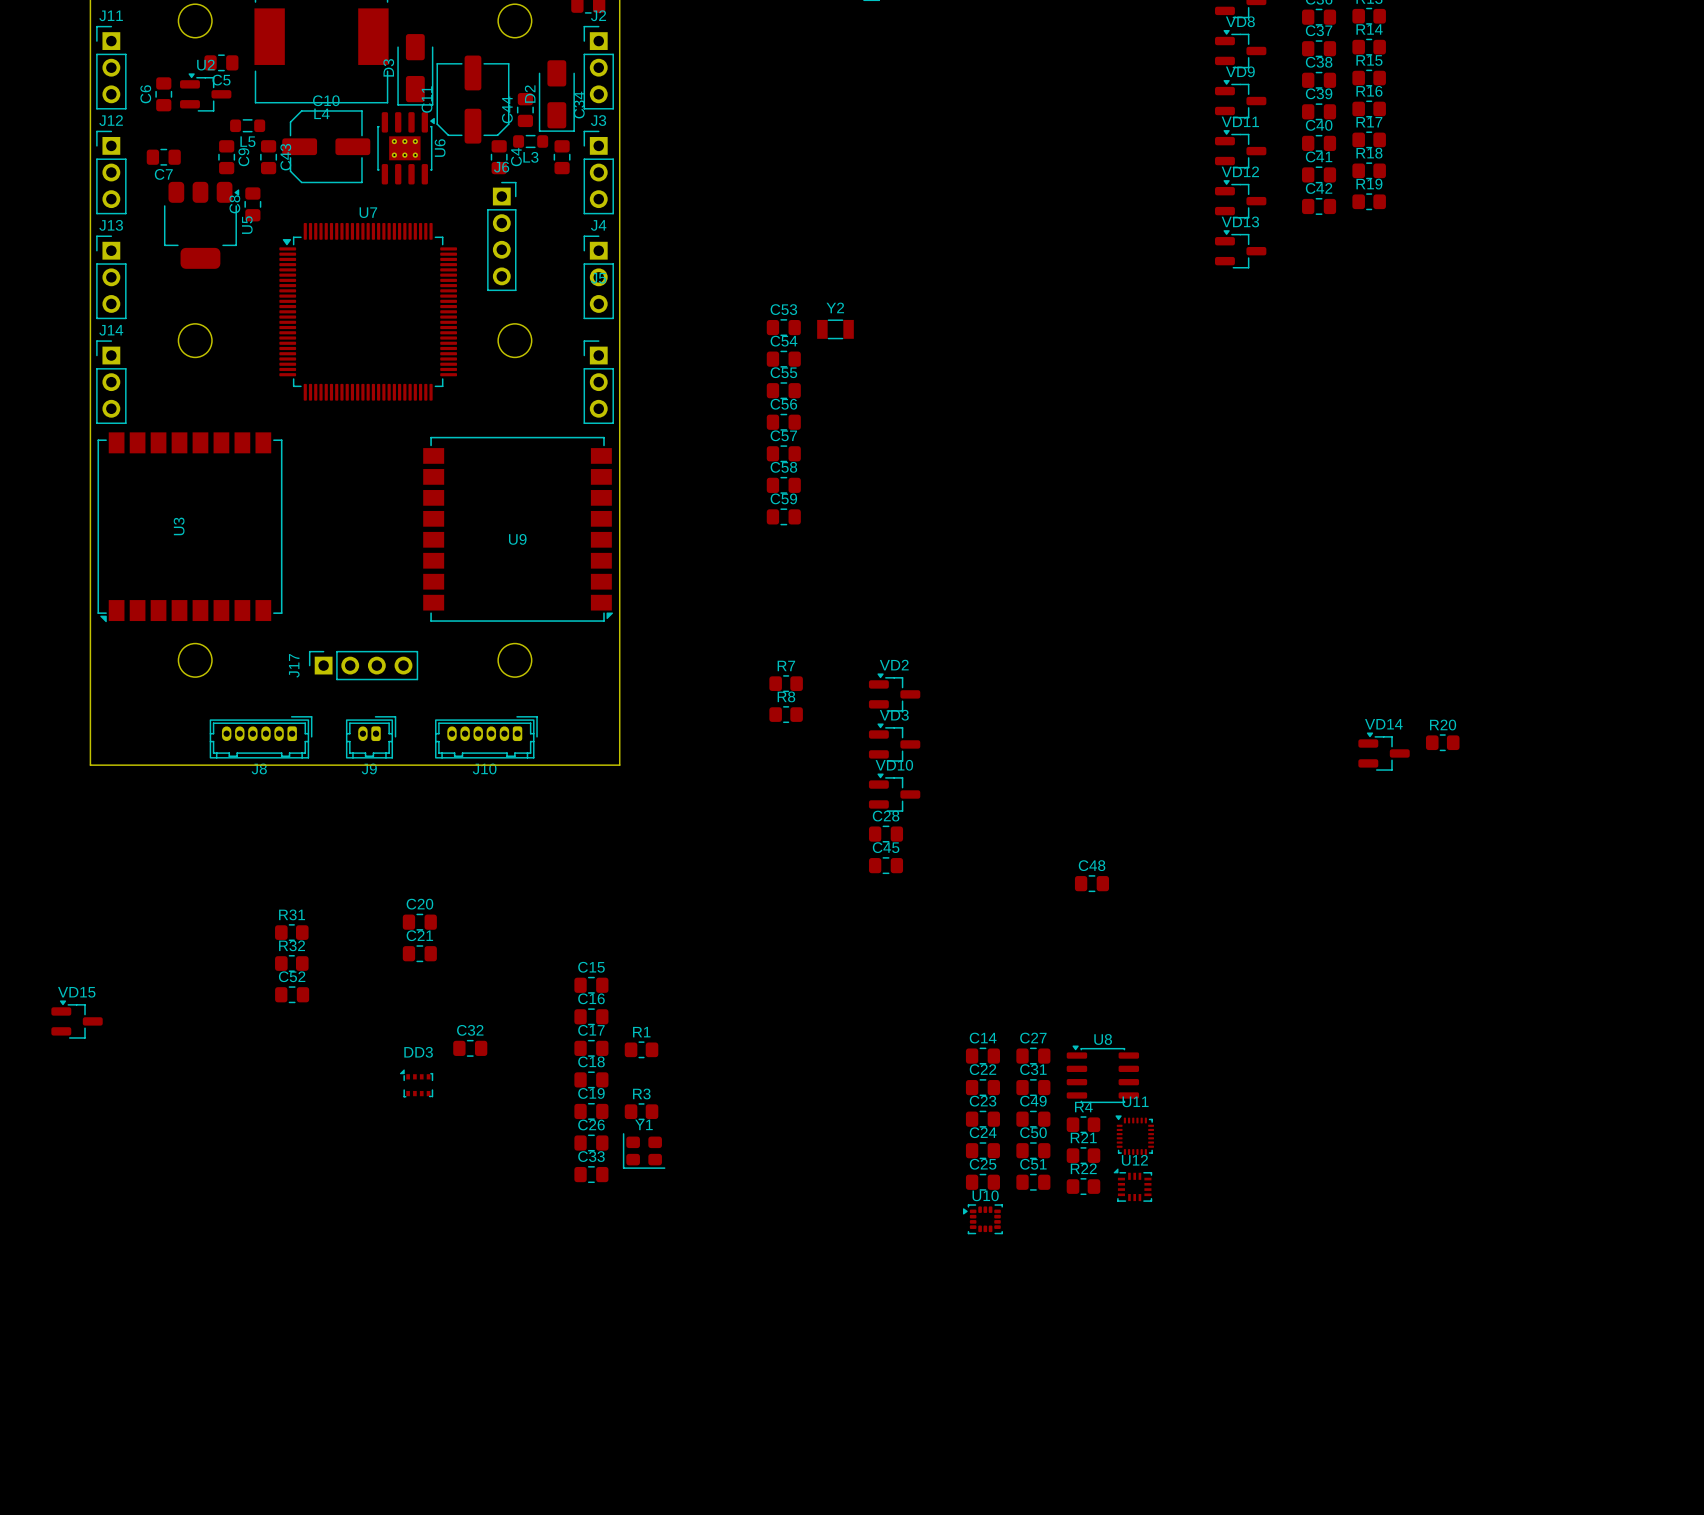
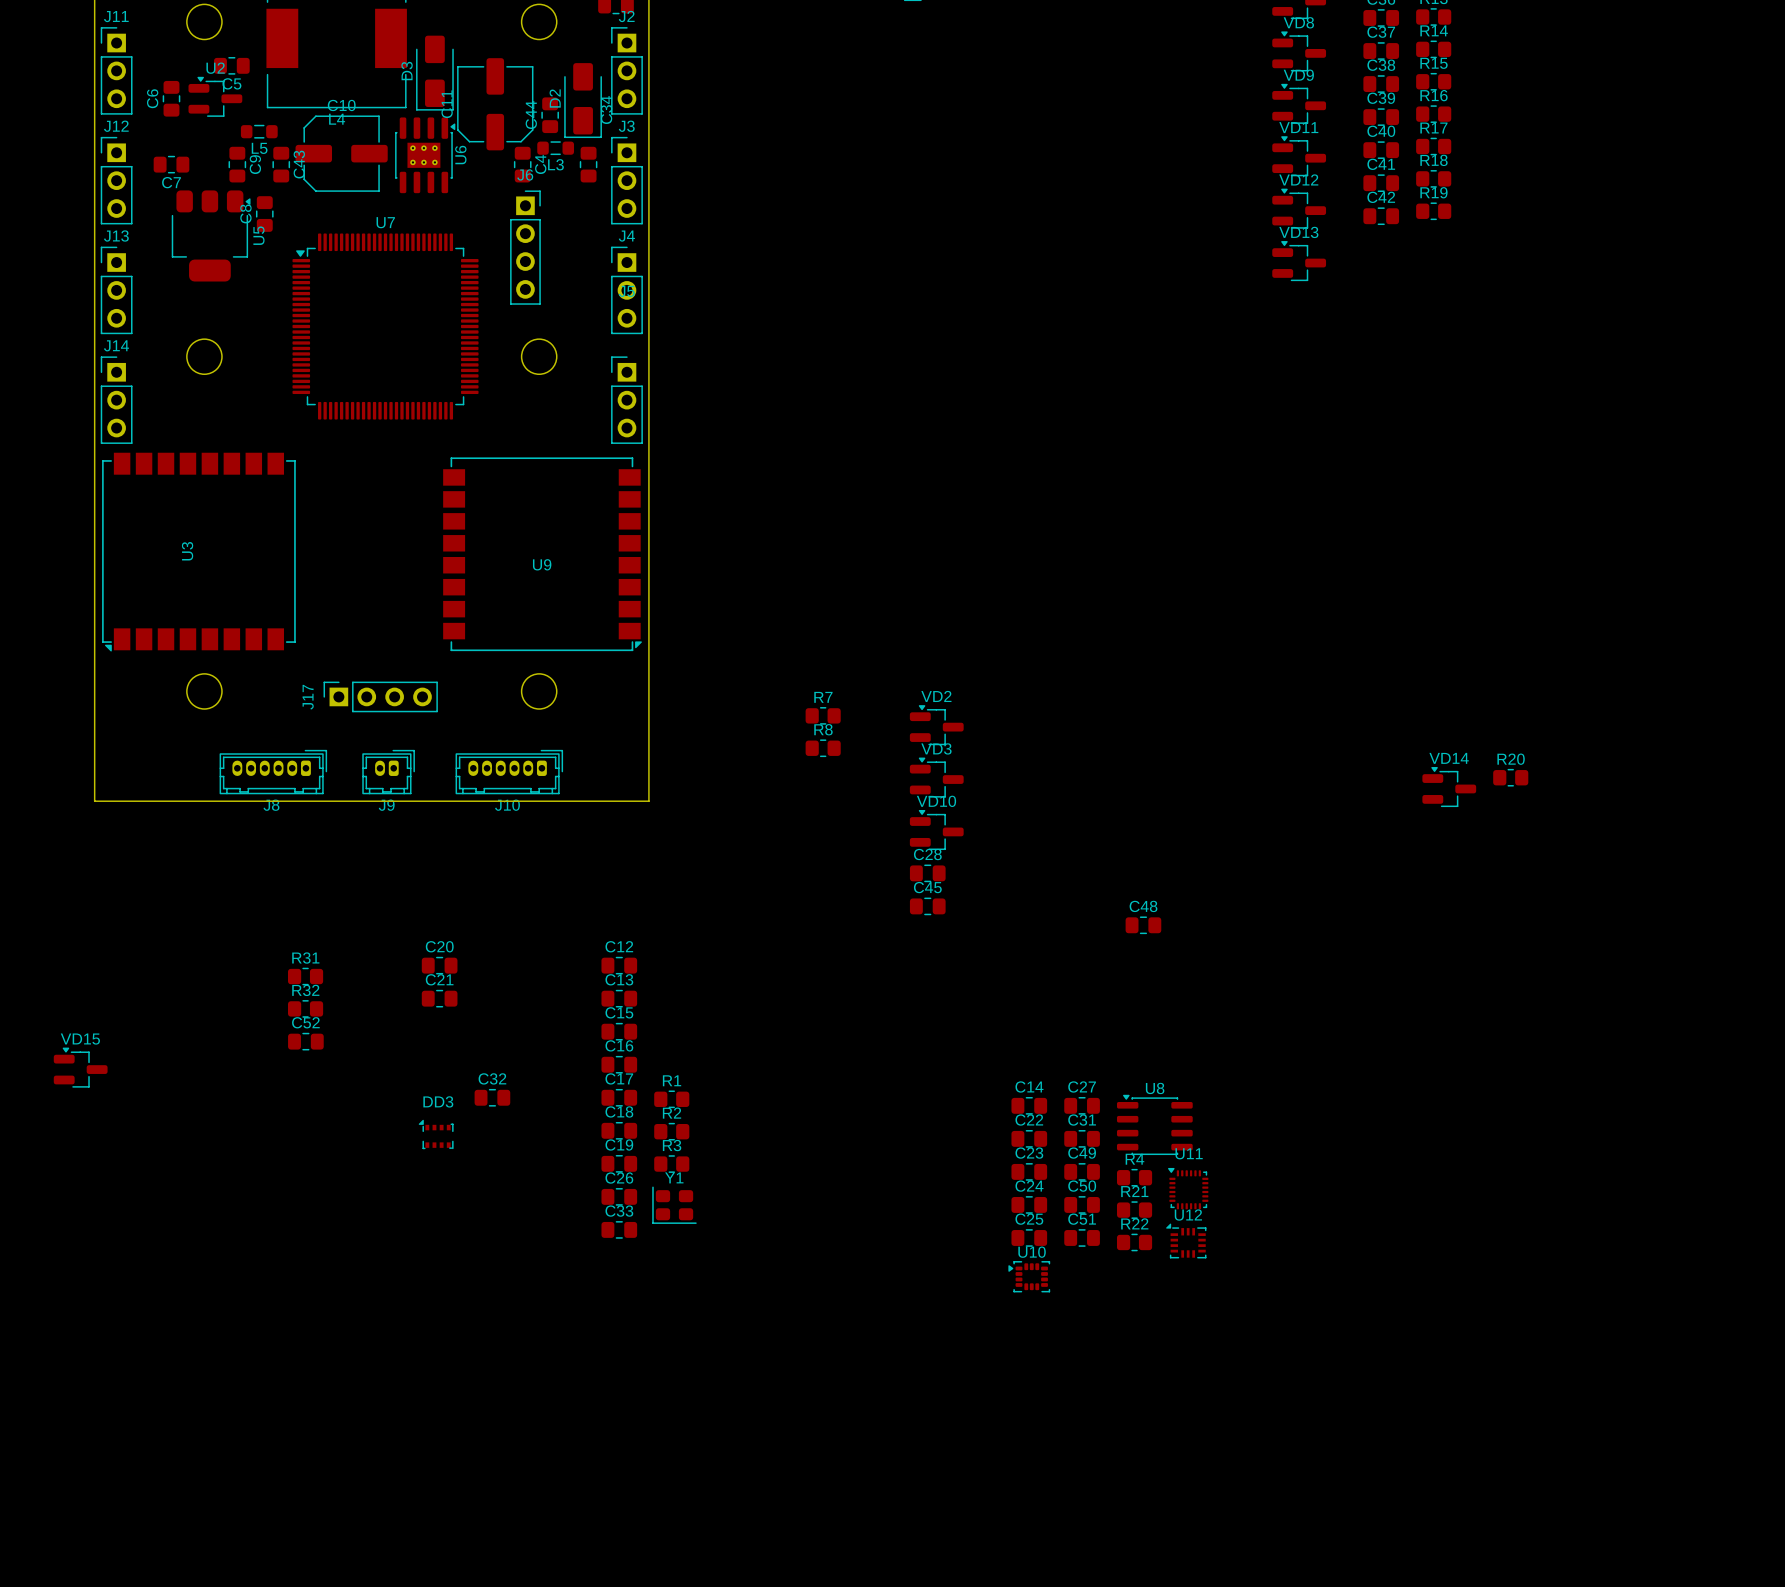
C53: (783, 327) -> none
Y2: (835, 329) -> none
C54: (783, 359) -> none
C55: (783, 390) -> none
C56: (783, 422) -> none
C57: (783, 453) -> none
C58: (783, 485) -> none
C59: (783, 516) -> none
C12: none -> (619, 965)
C13: none -> (619, 998)
R2: none -> (671, 1131)

